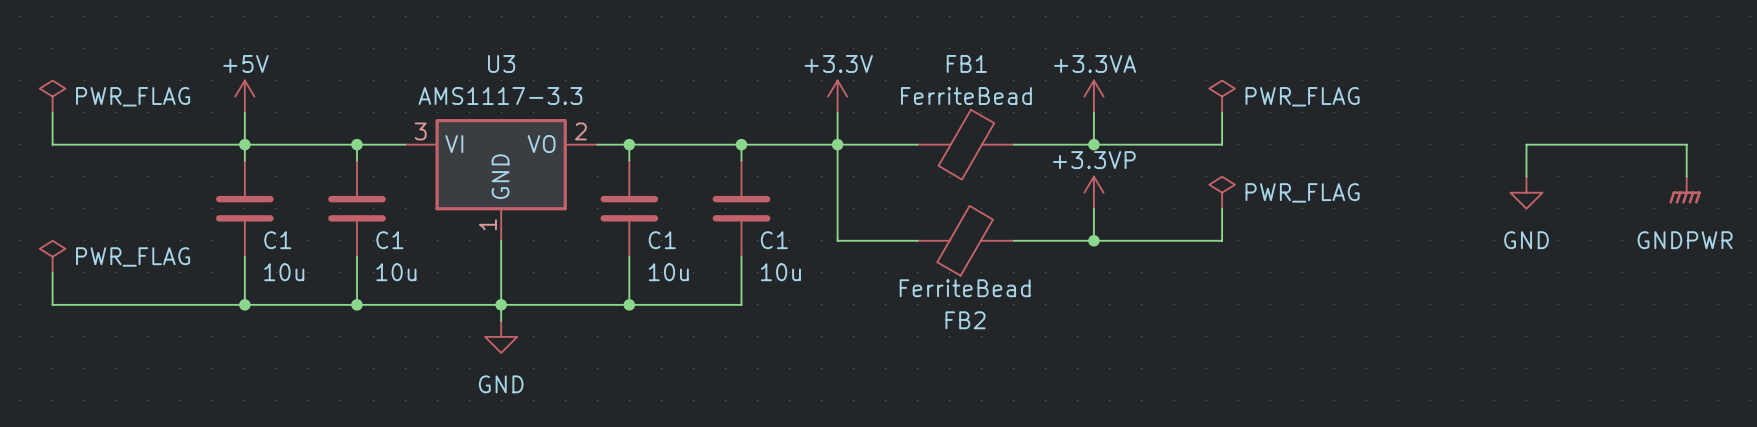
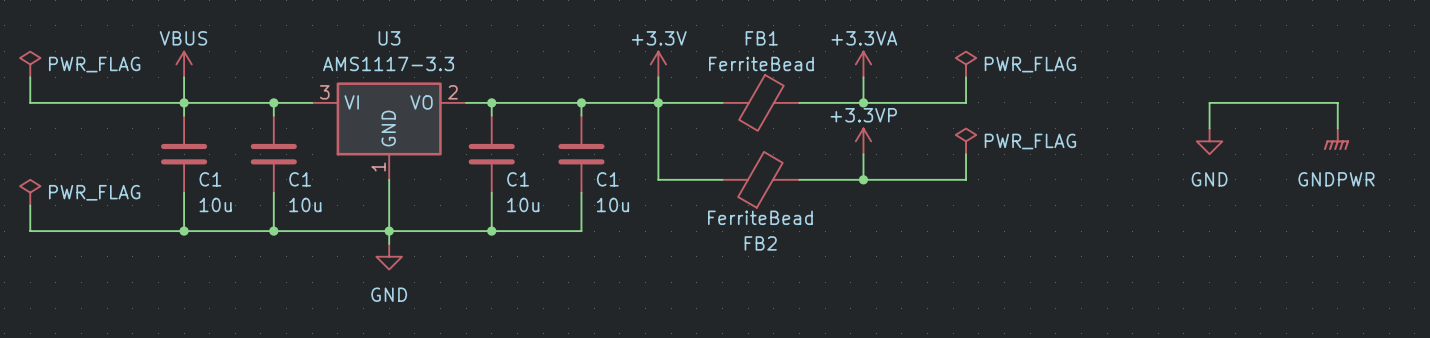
power symbol: +5V (244, 96) -> VBUS (184, 64)

